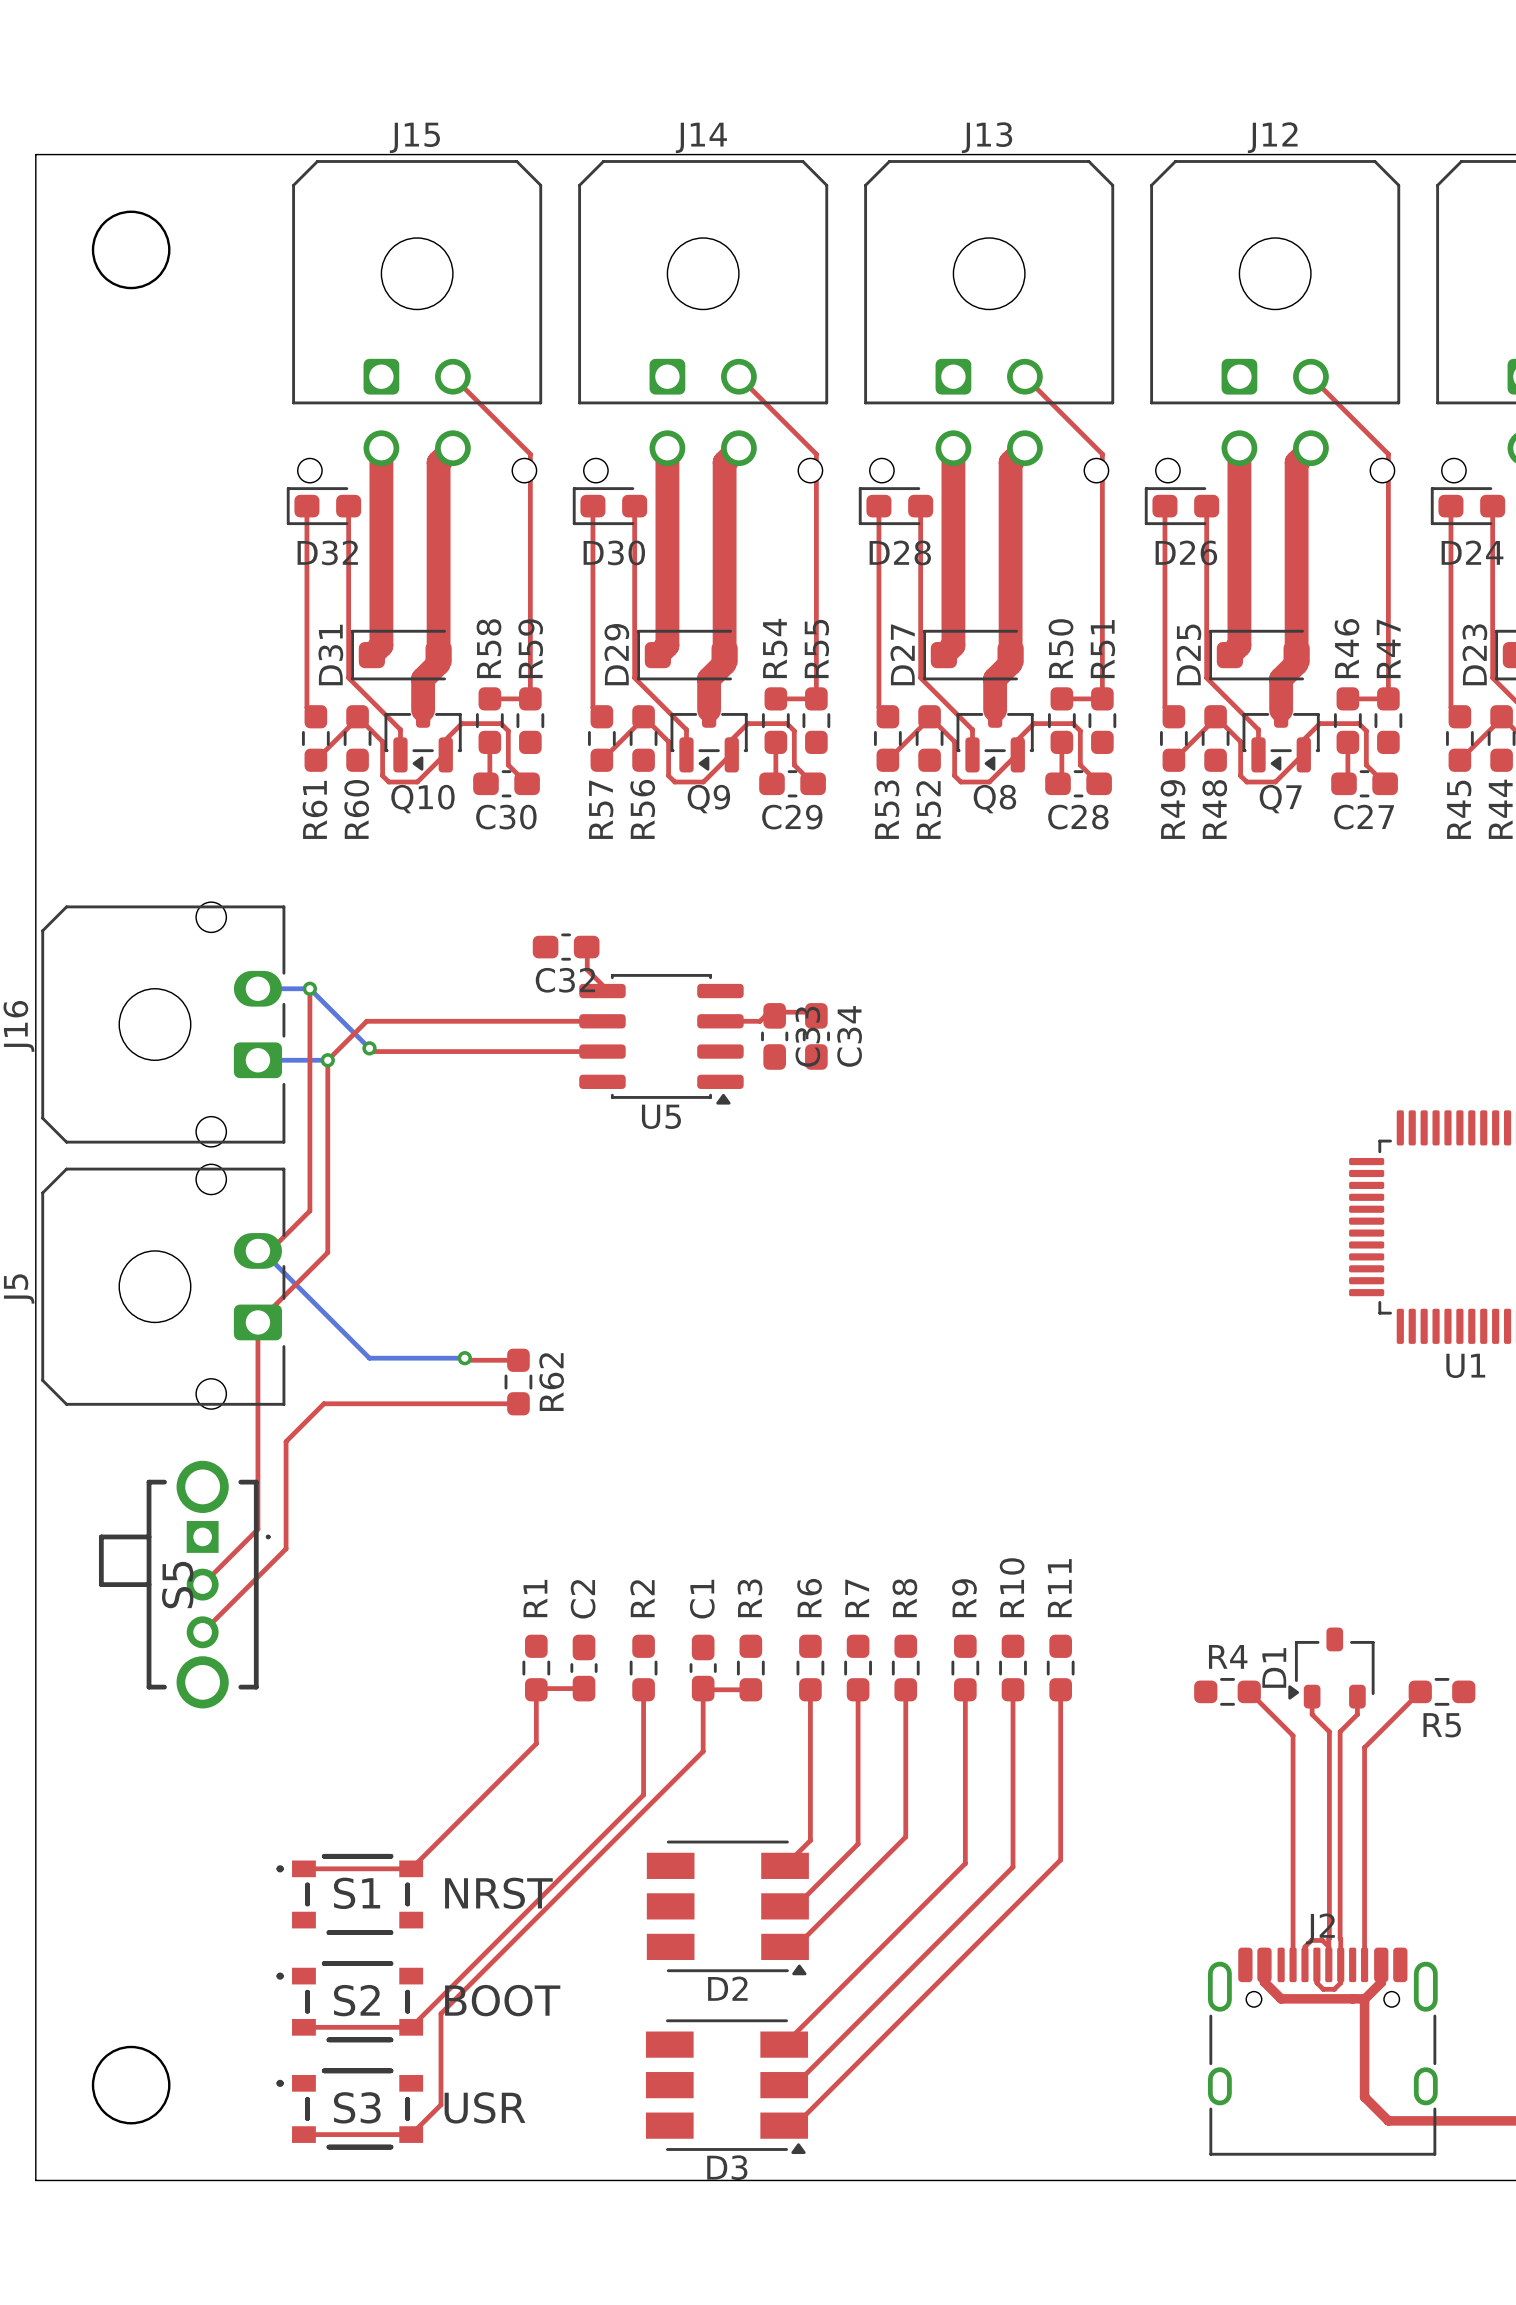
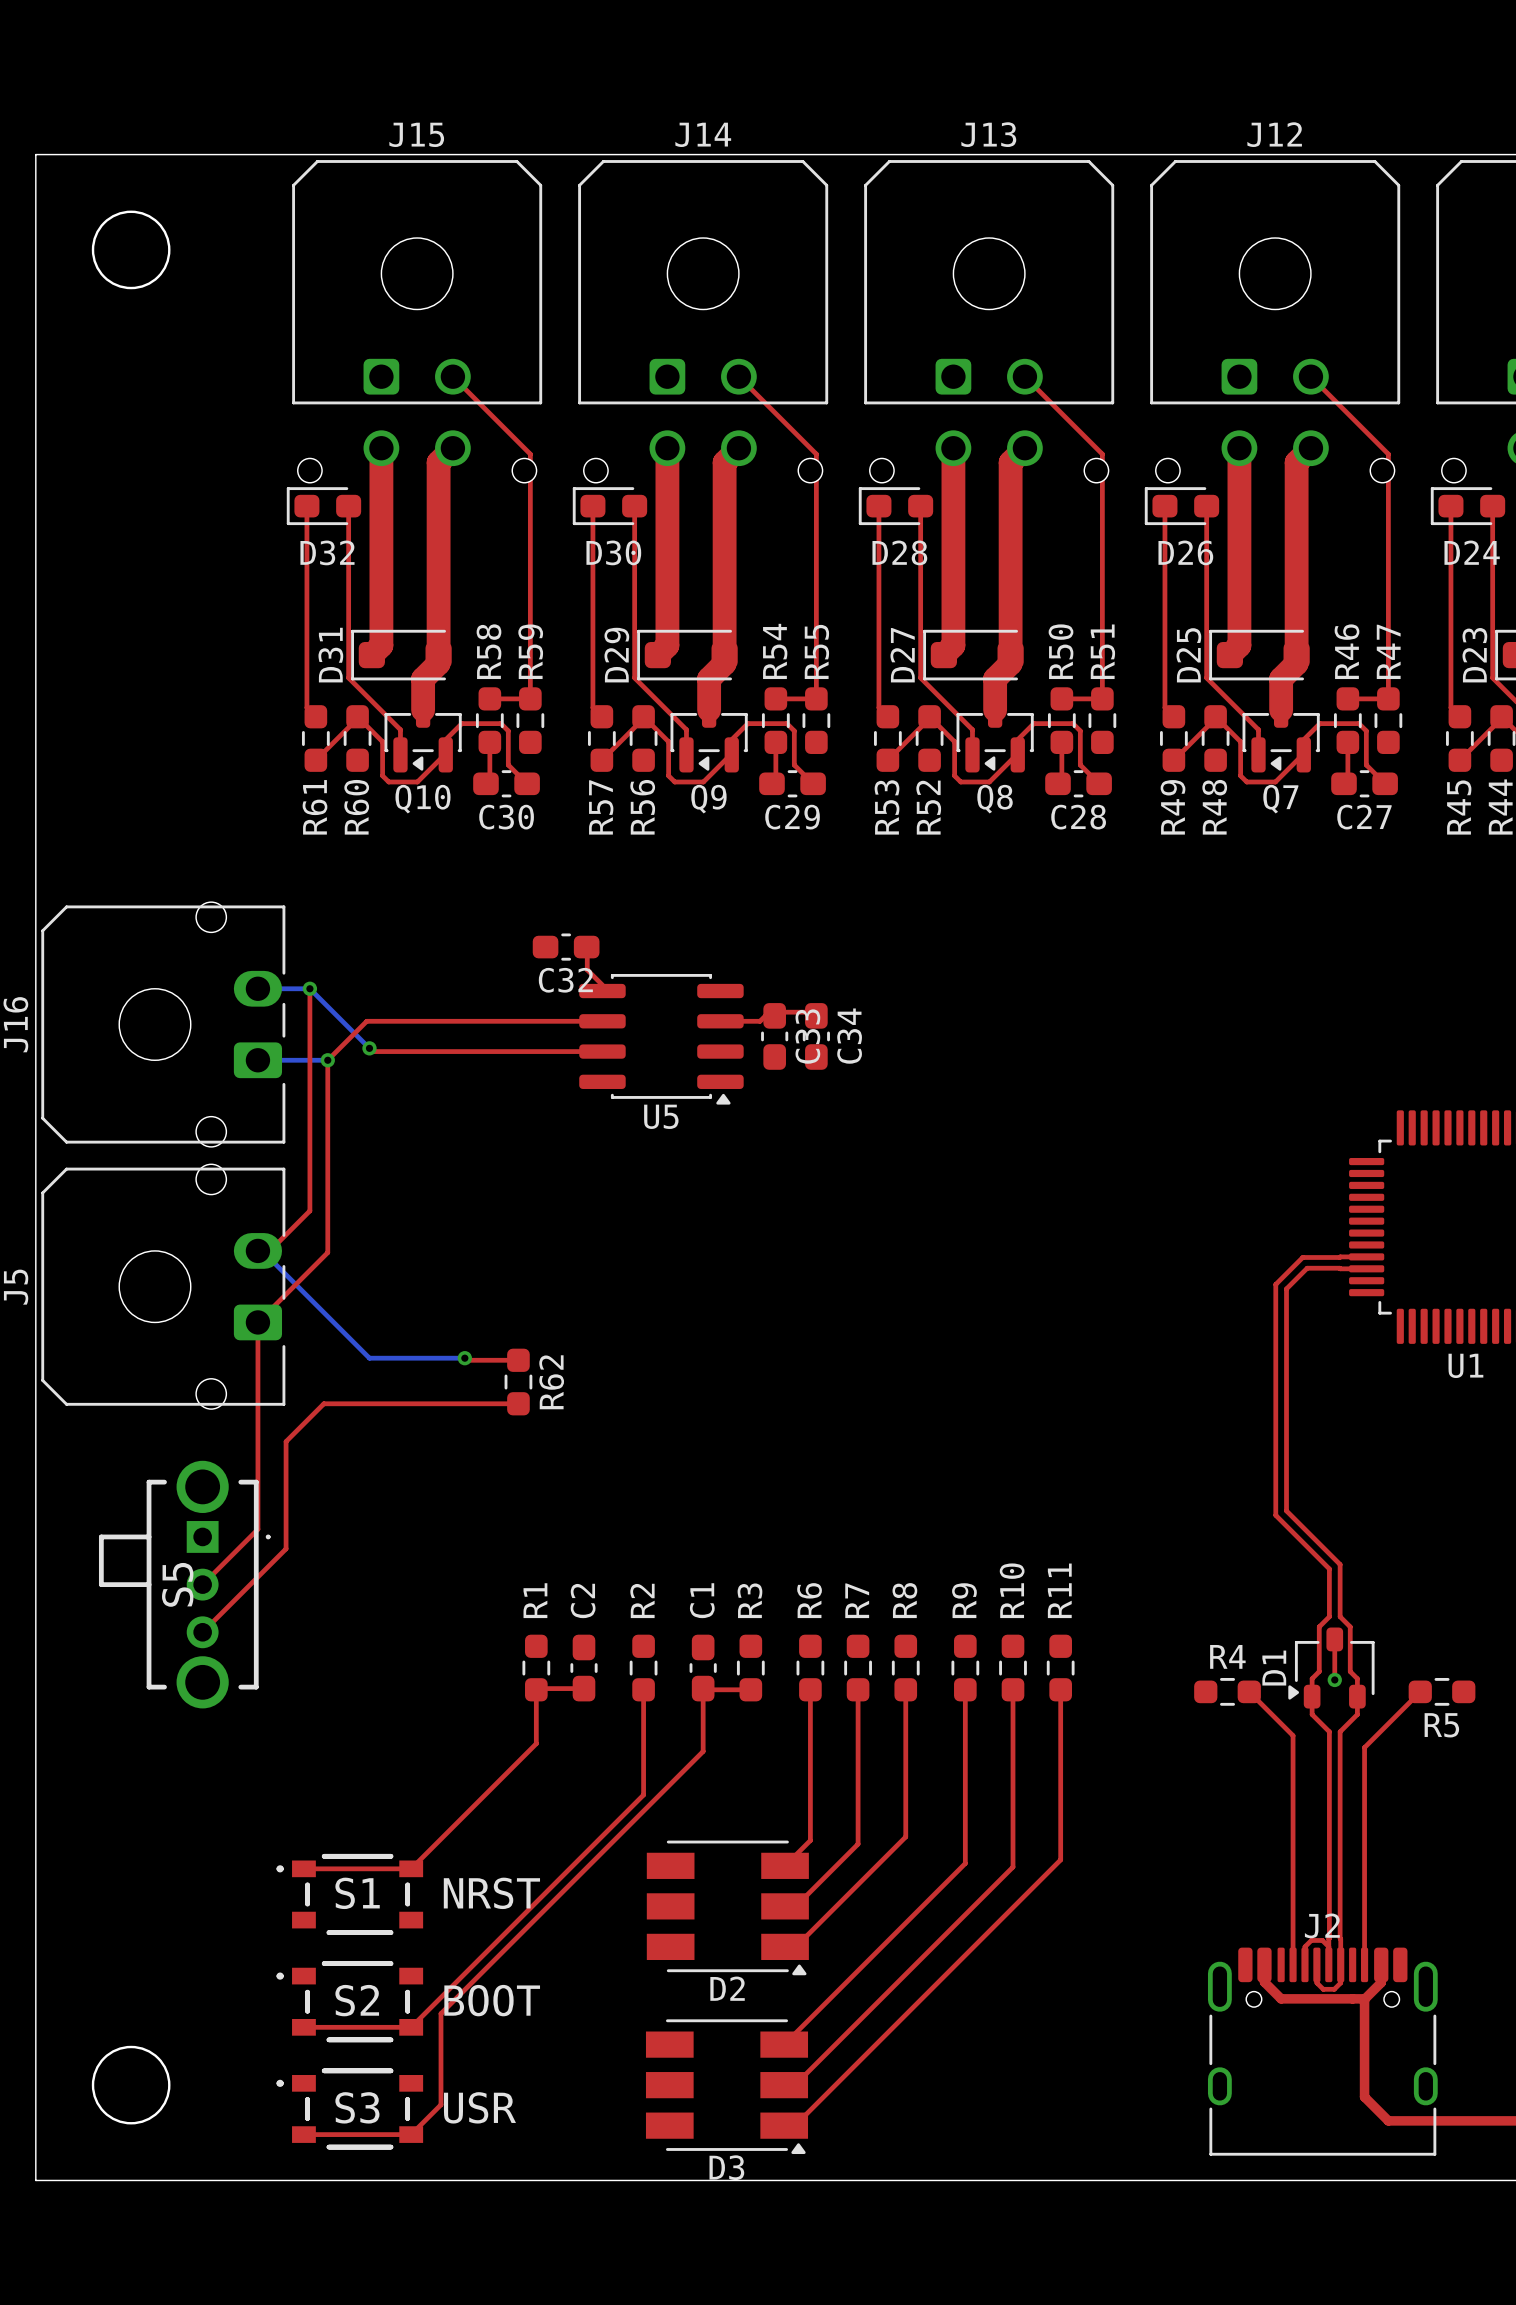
top track: none -> (1366, 1256) (1302, 1257) (1275, 1284) (1275, 1515) (1329, 1568) (1329, 1616) (1319, 1626) (1319, 1671) (1312, 1678) (1312, 1696)
top track: none -> (1366, 1268) (1307, 1268) (1286, 1288) (1286, 1510) (1340, 1564) (1340, 1616) (1350, 1626) (1350, 1671) (1357, 1678) (1357, 1696)
top track: none -> (1334, 1639) (1334, 1679)
via: none -> (1334, 1679)

